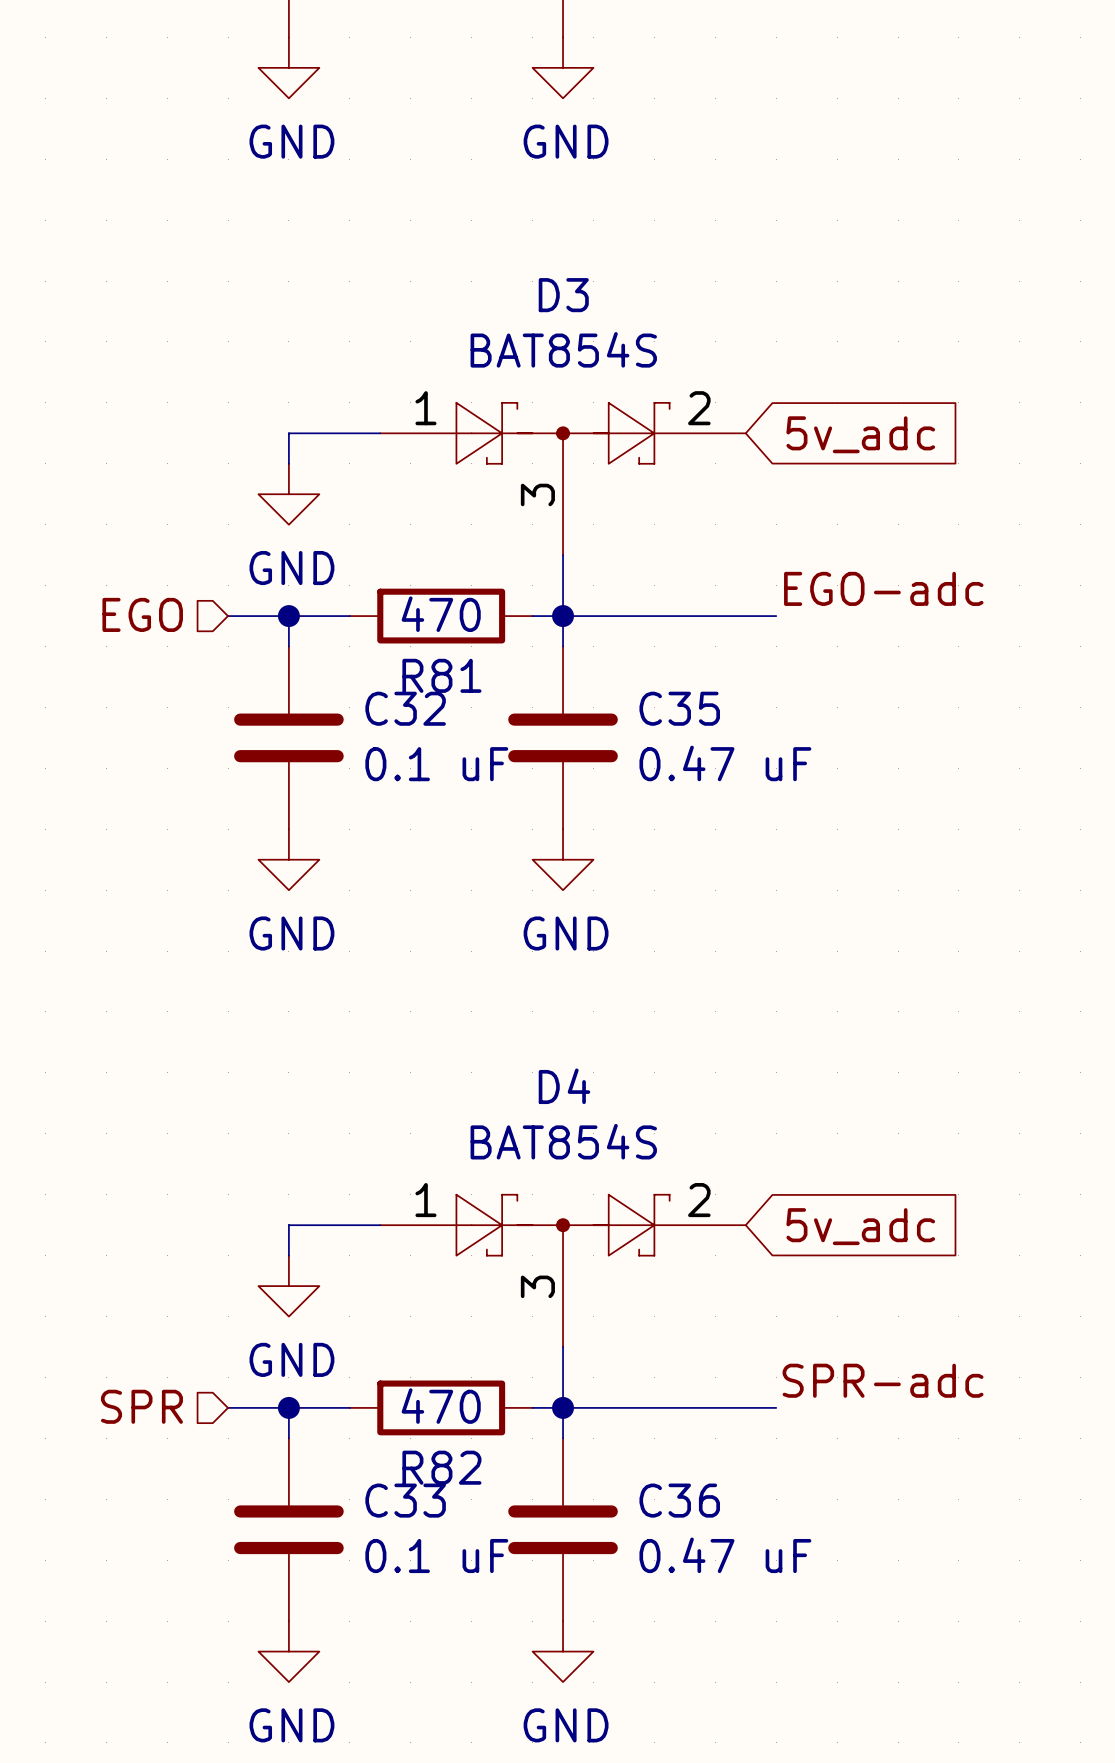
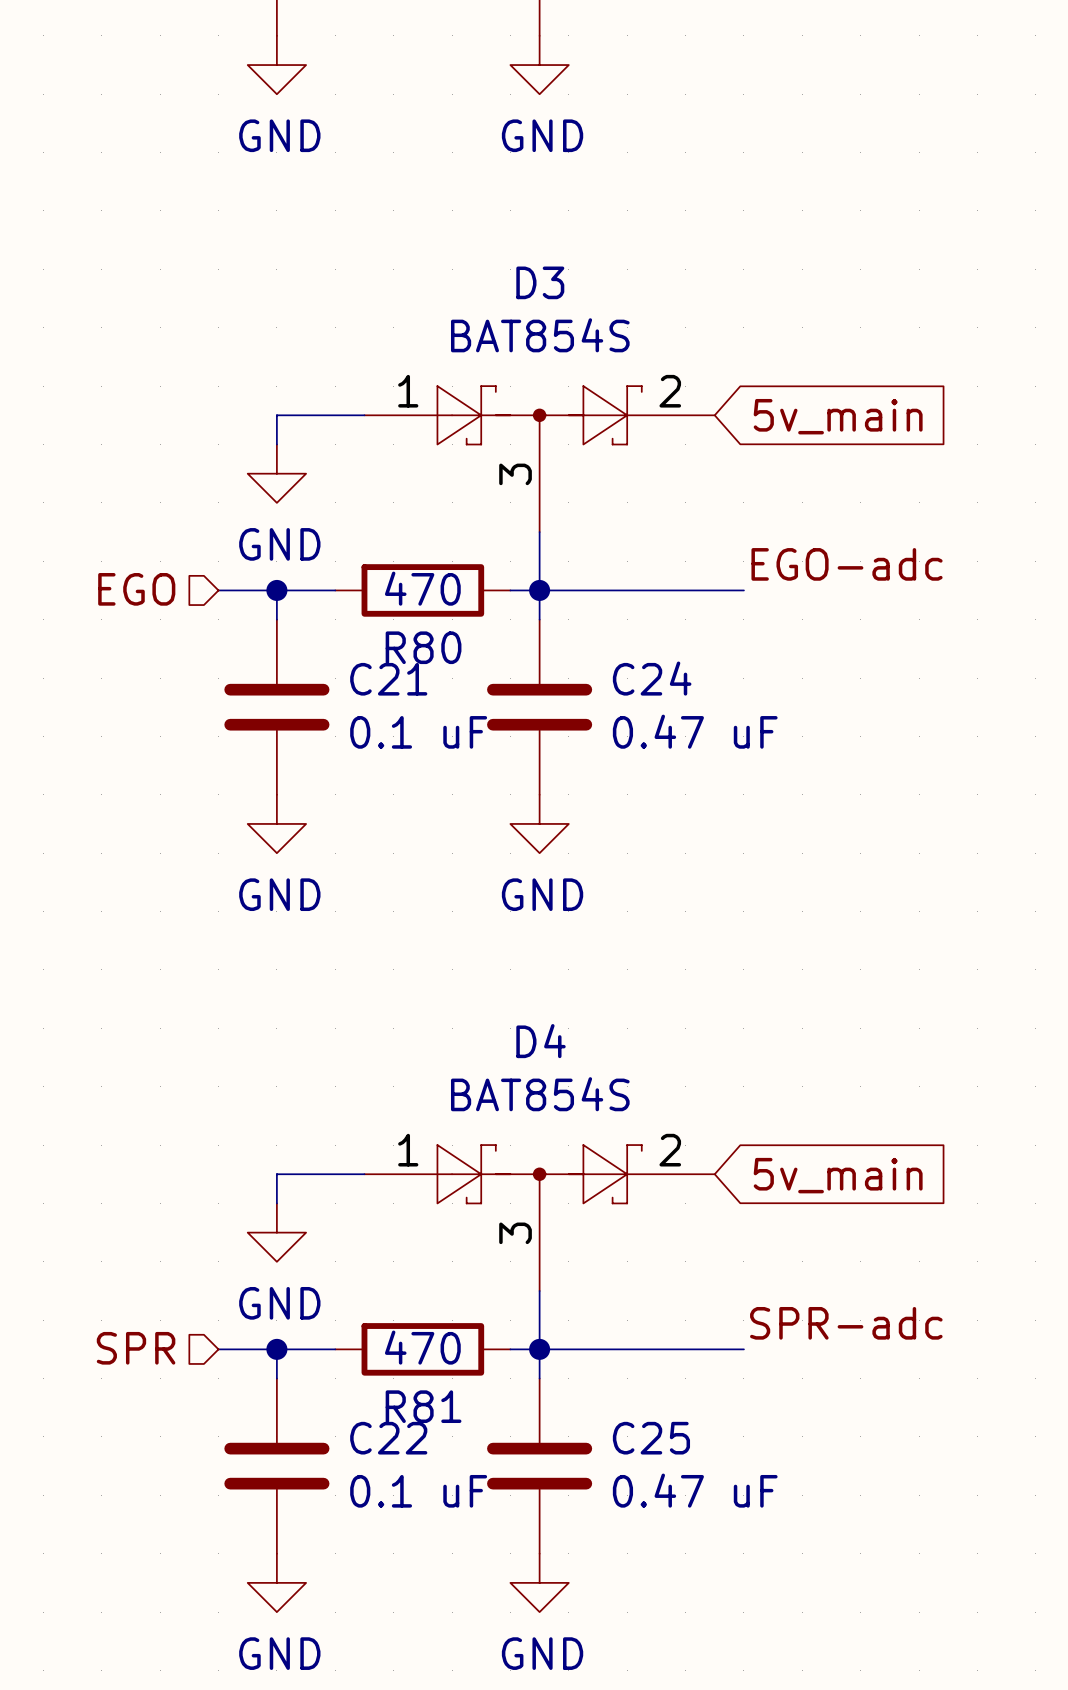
global label: 5v_adc (860, 434) -> 5v_main (838, 416)
R81 name: R81 (441, 675) -> R80 (423, 647)
C32 name: C32 (405, 708) -> C21 (388, 679)
C35 name: C35 (679, 708) -> C24 (652, 678)
global label: 5v_adc (860, 1226) -> 5v_main (838, 1175)
R82 name: R82 (441, 1467) -> R81 (423, 1406)
C33 name: C33 (405, 1500) -> C22 (388, 1438)
C36 name: C36 (679, 1500) -> C25 (651, 1438)

